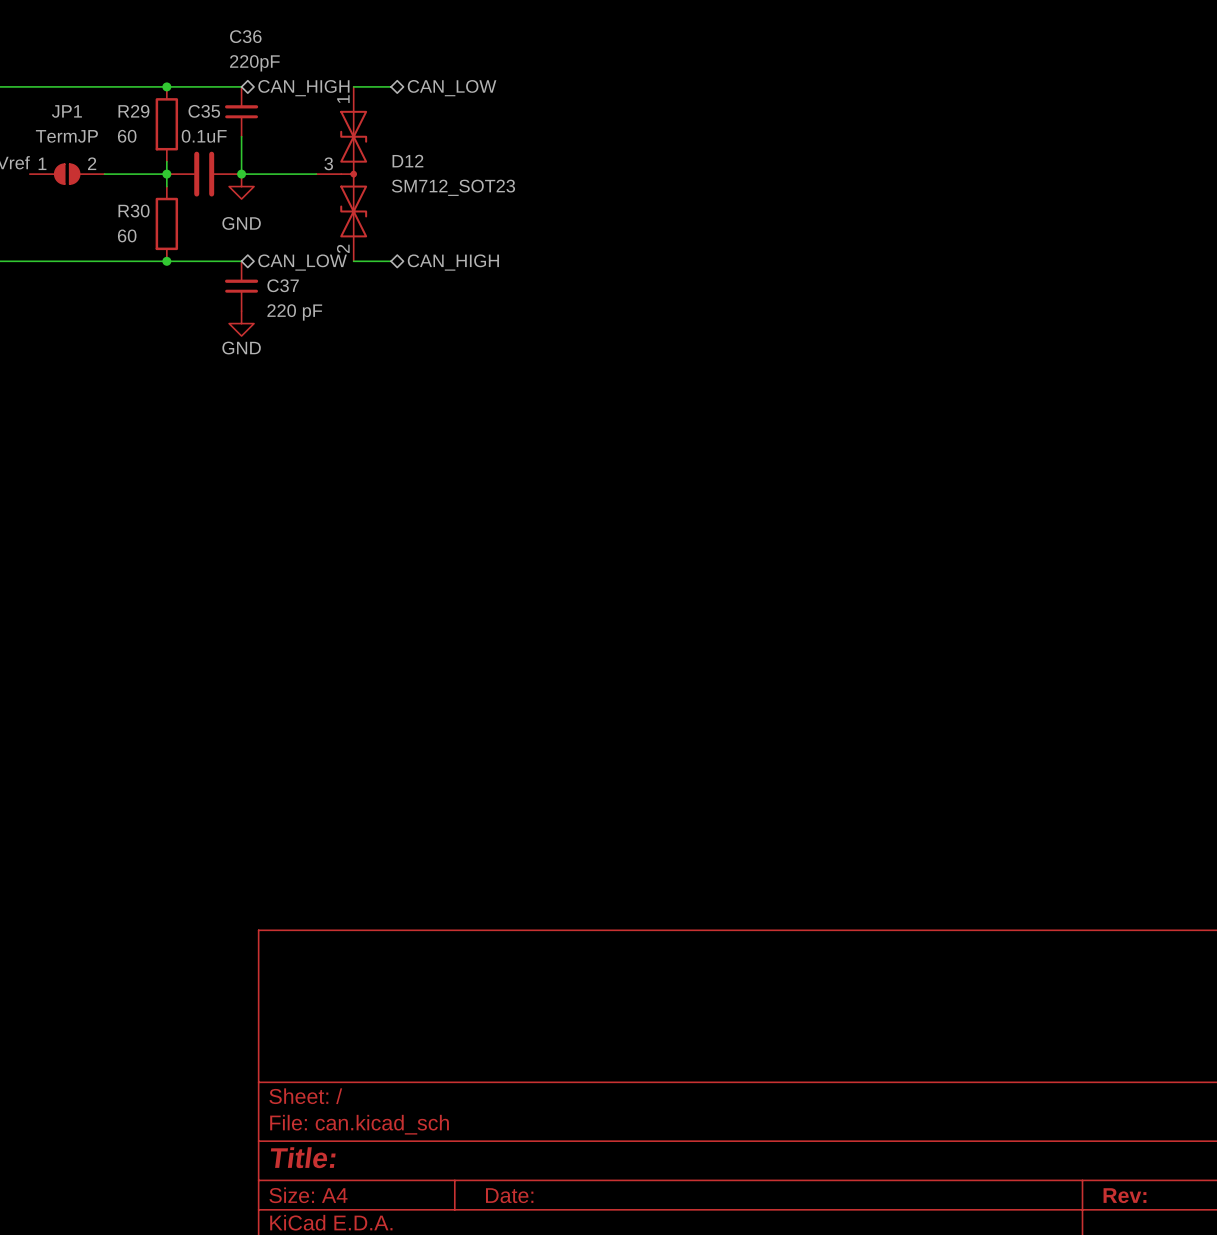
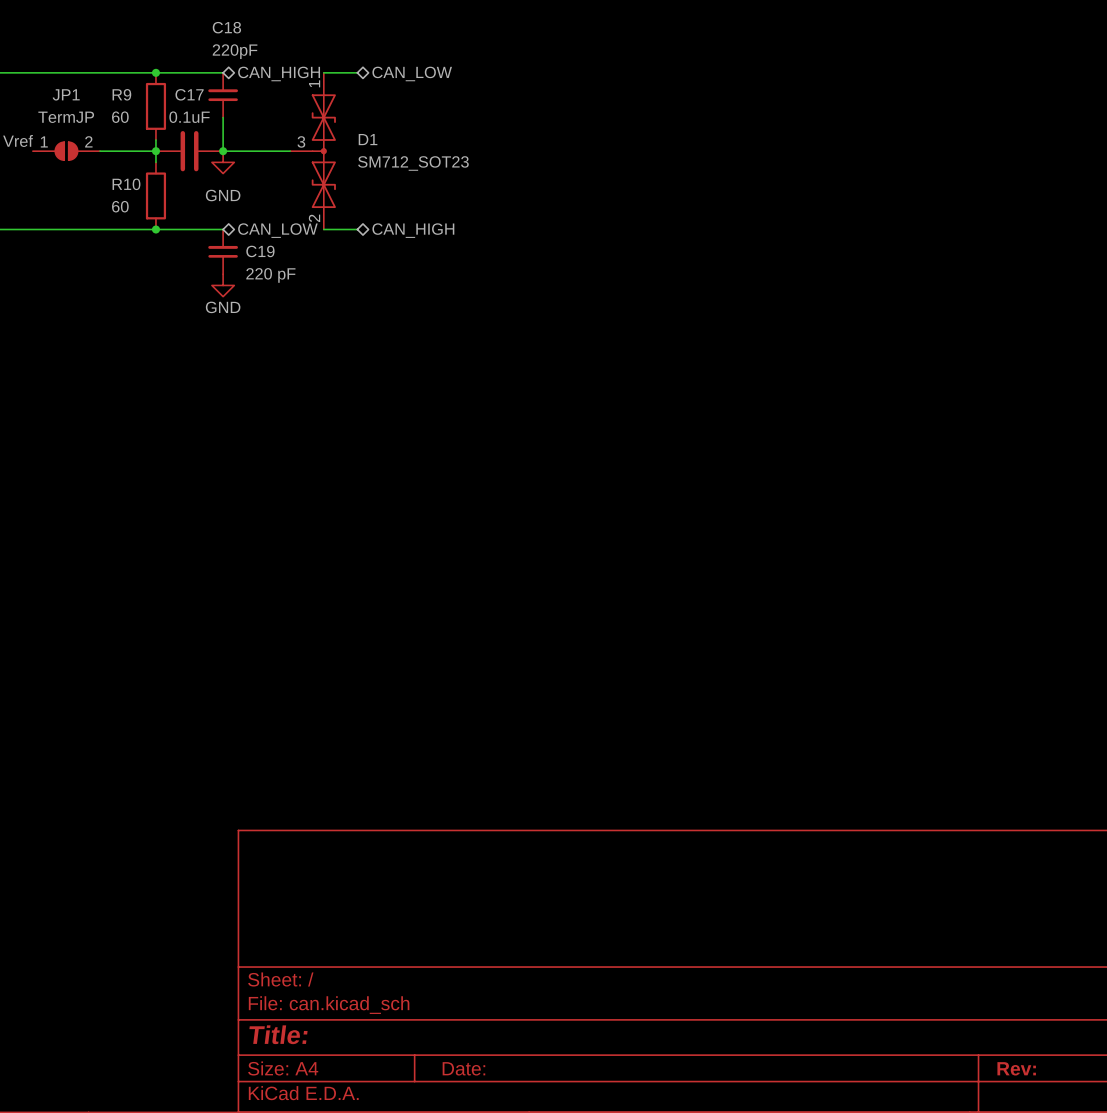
C36 name: C36 (245, 36) -> C18 (226, 27)
R29 name: R29 (133, 111) -> R9 (121, 94)
C35 name: C35 (204, 111) -> C17 (189, 94)
D12 name: D12 (407, 161) -> D1 (368, 139)
R30 name: R30 (134, 211) -> R10 (126, 184)
C37 name: C37 (283, 285) -> C19 (260, 251)

